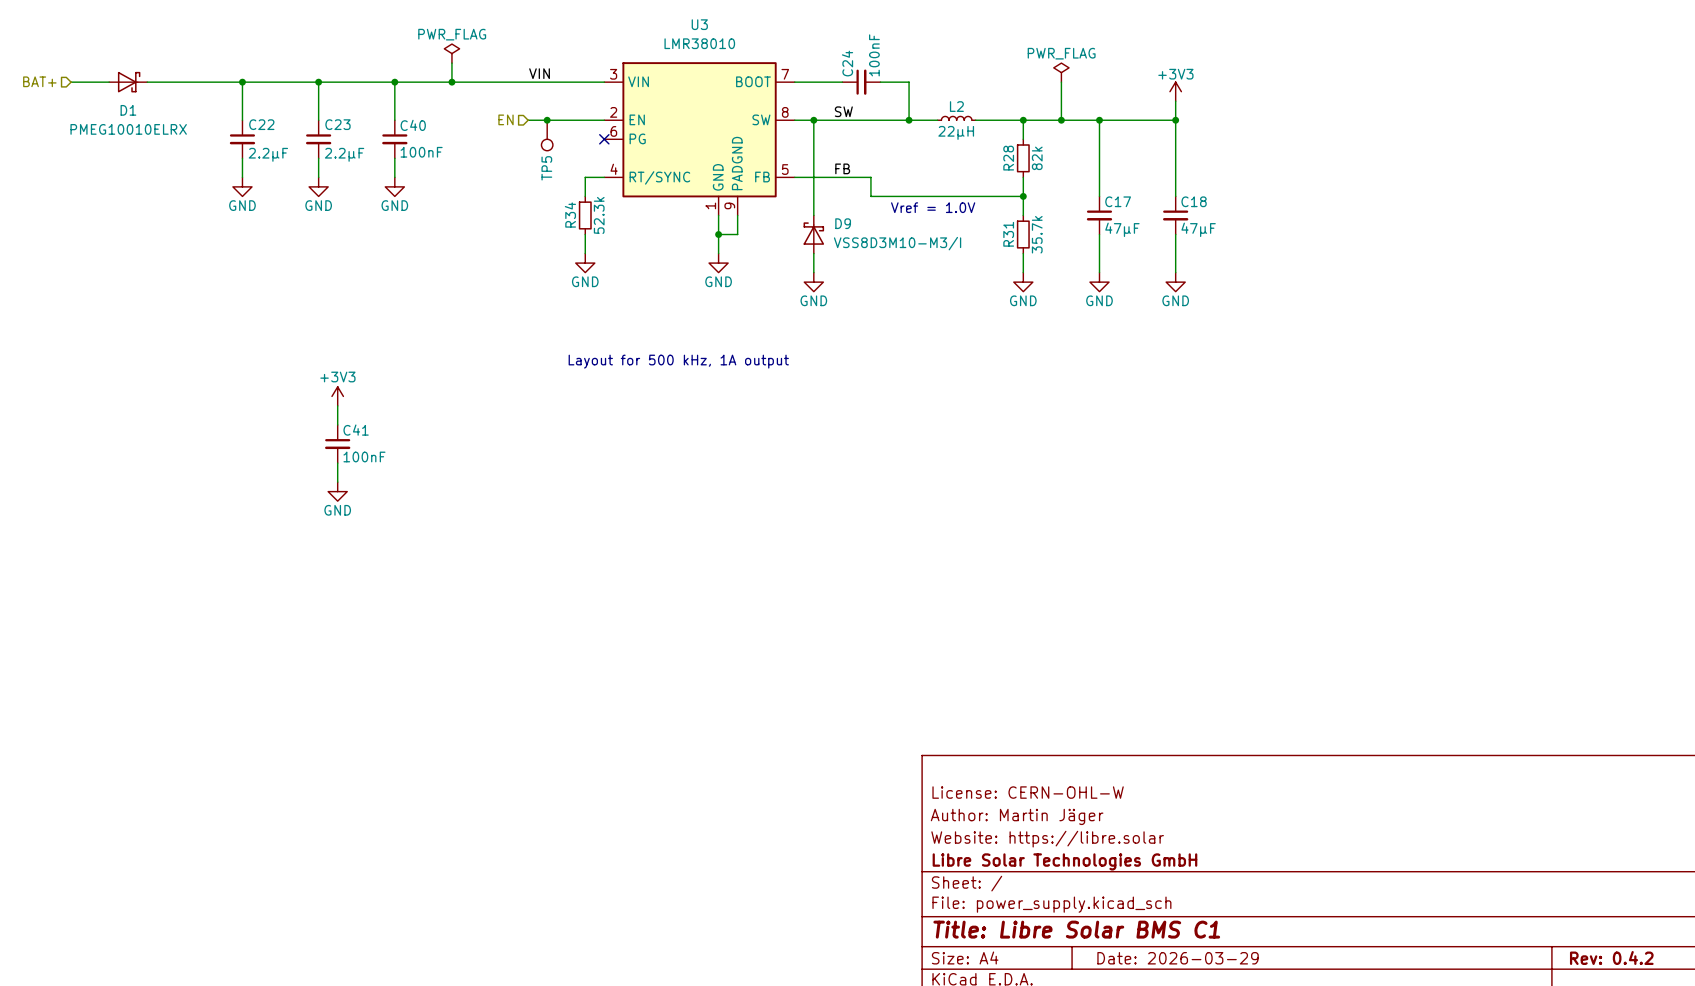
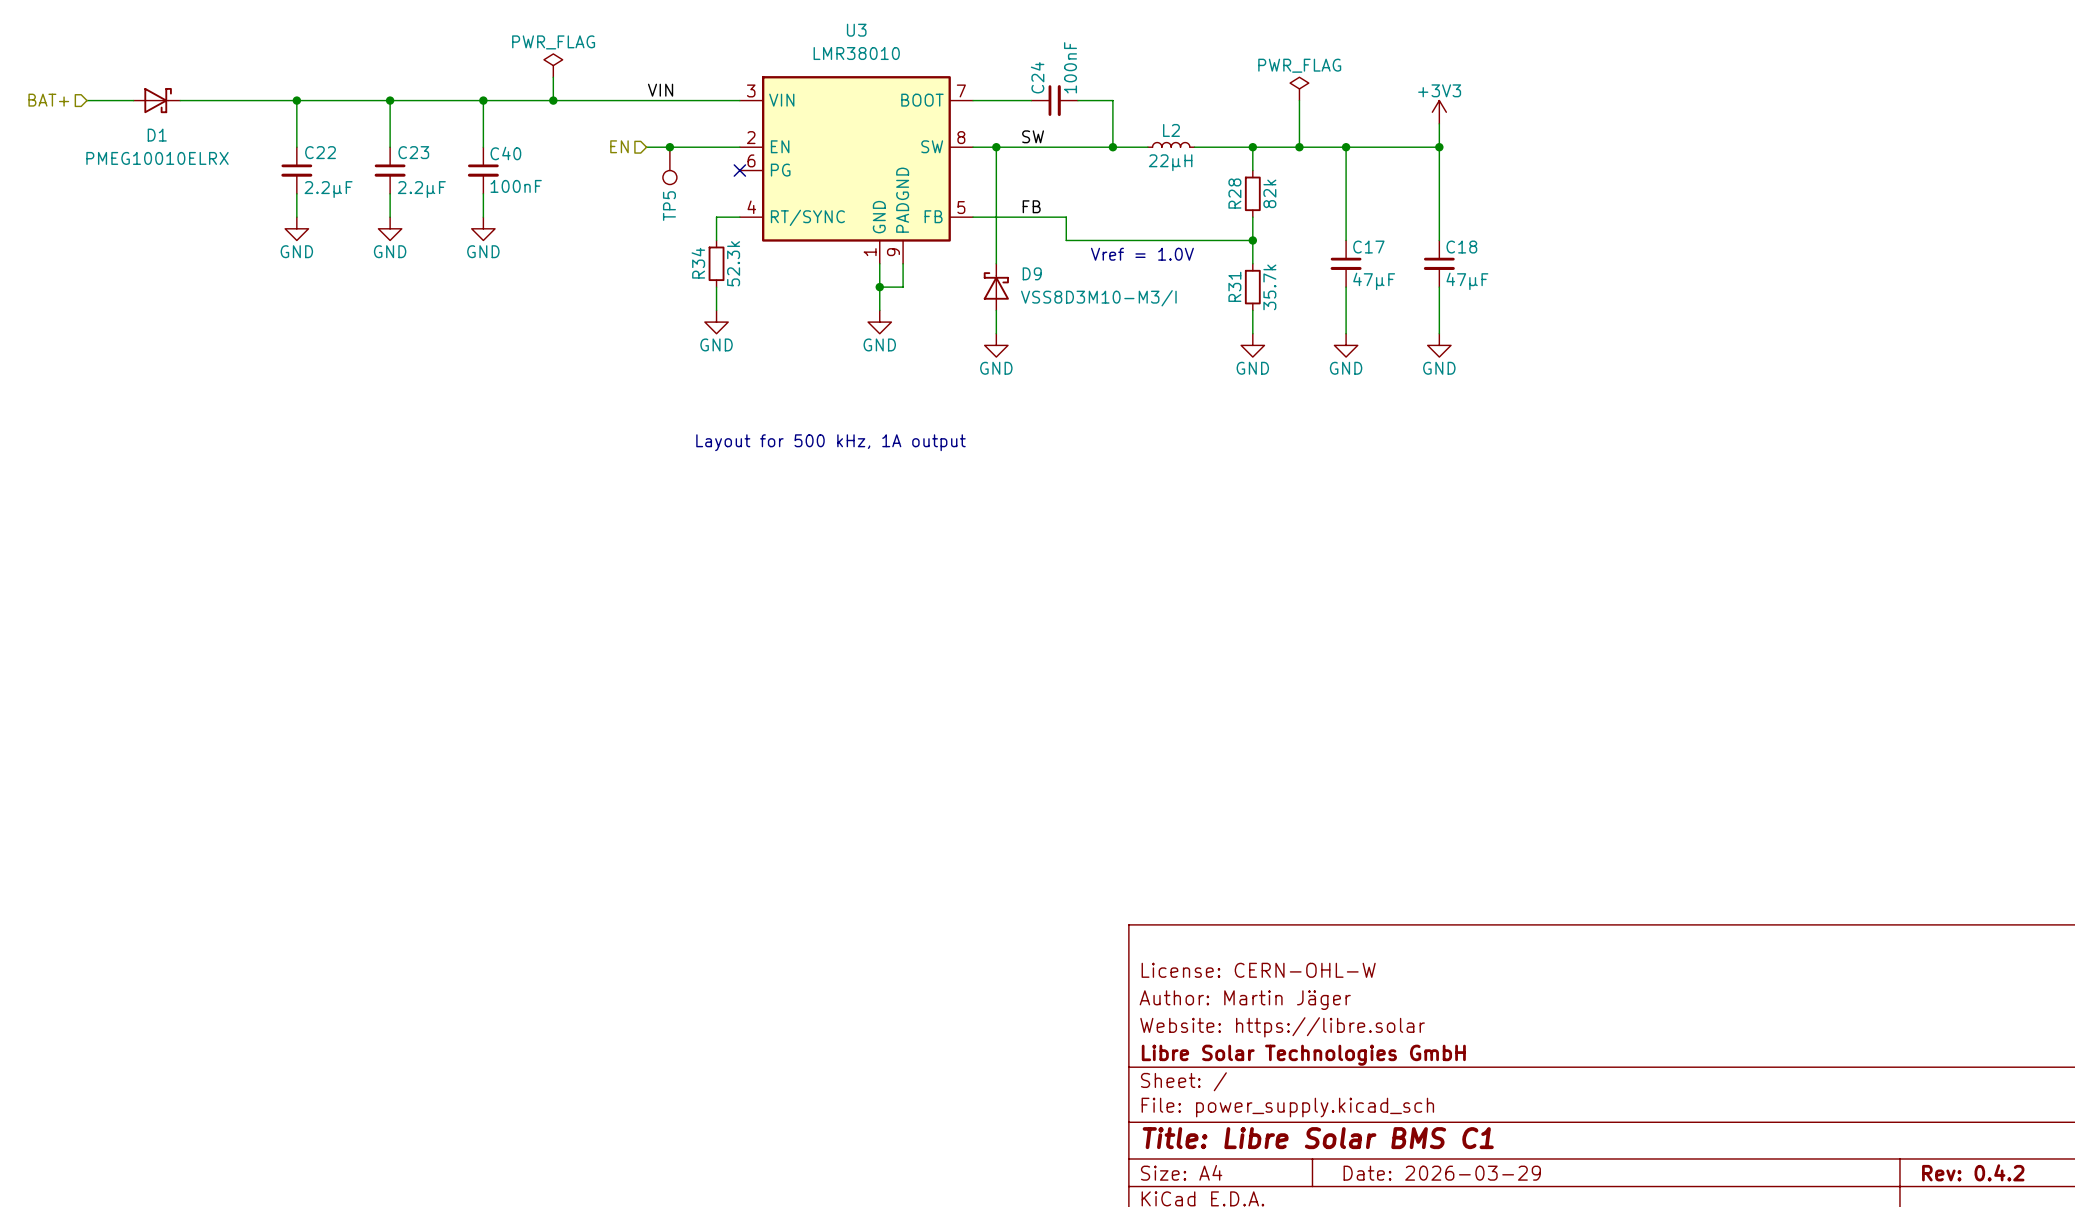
power symbol: +3V3 (337, 396) -> none
wire: (337, 405) (337, 424) -> none
C41: 100nF (337, 444) -> none
wire: (337, 463) (337, 482) -> none
power symbol: GND (337, 491) -> none

